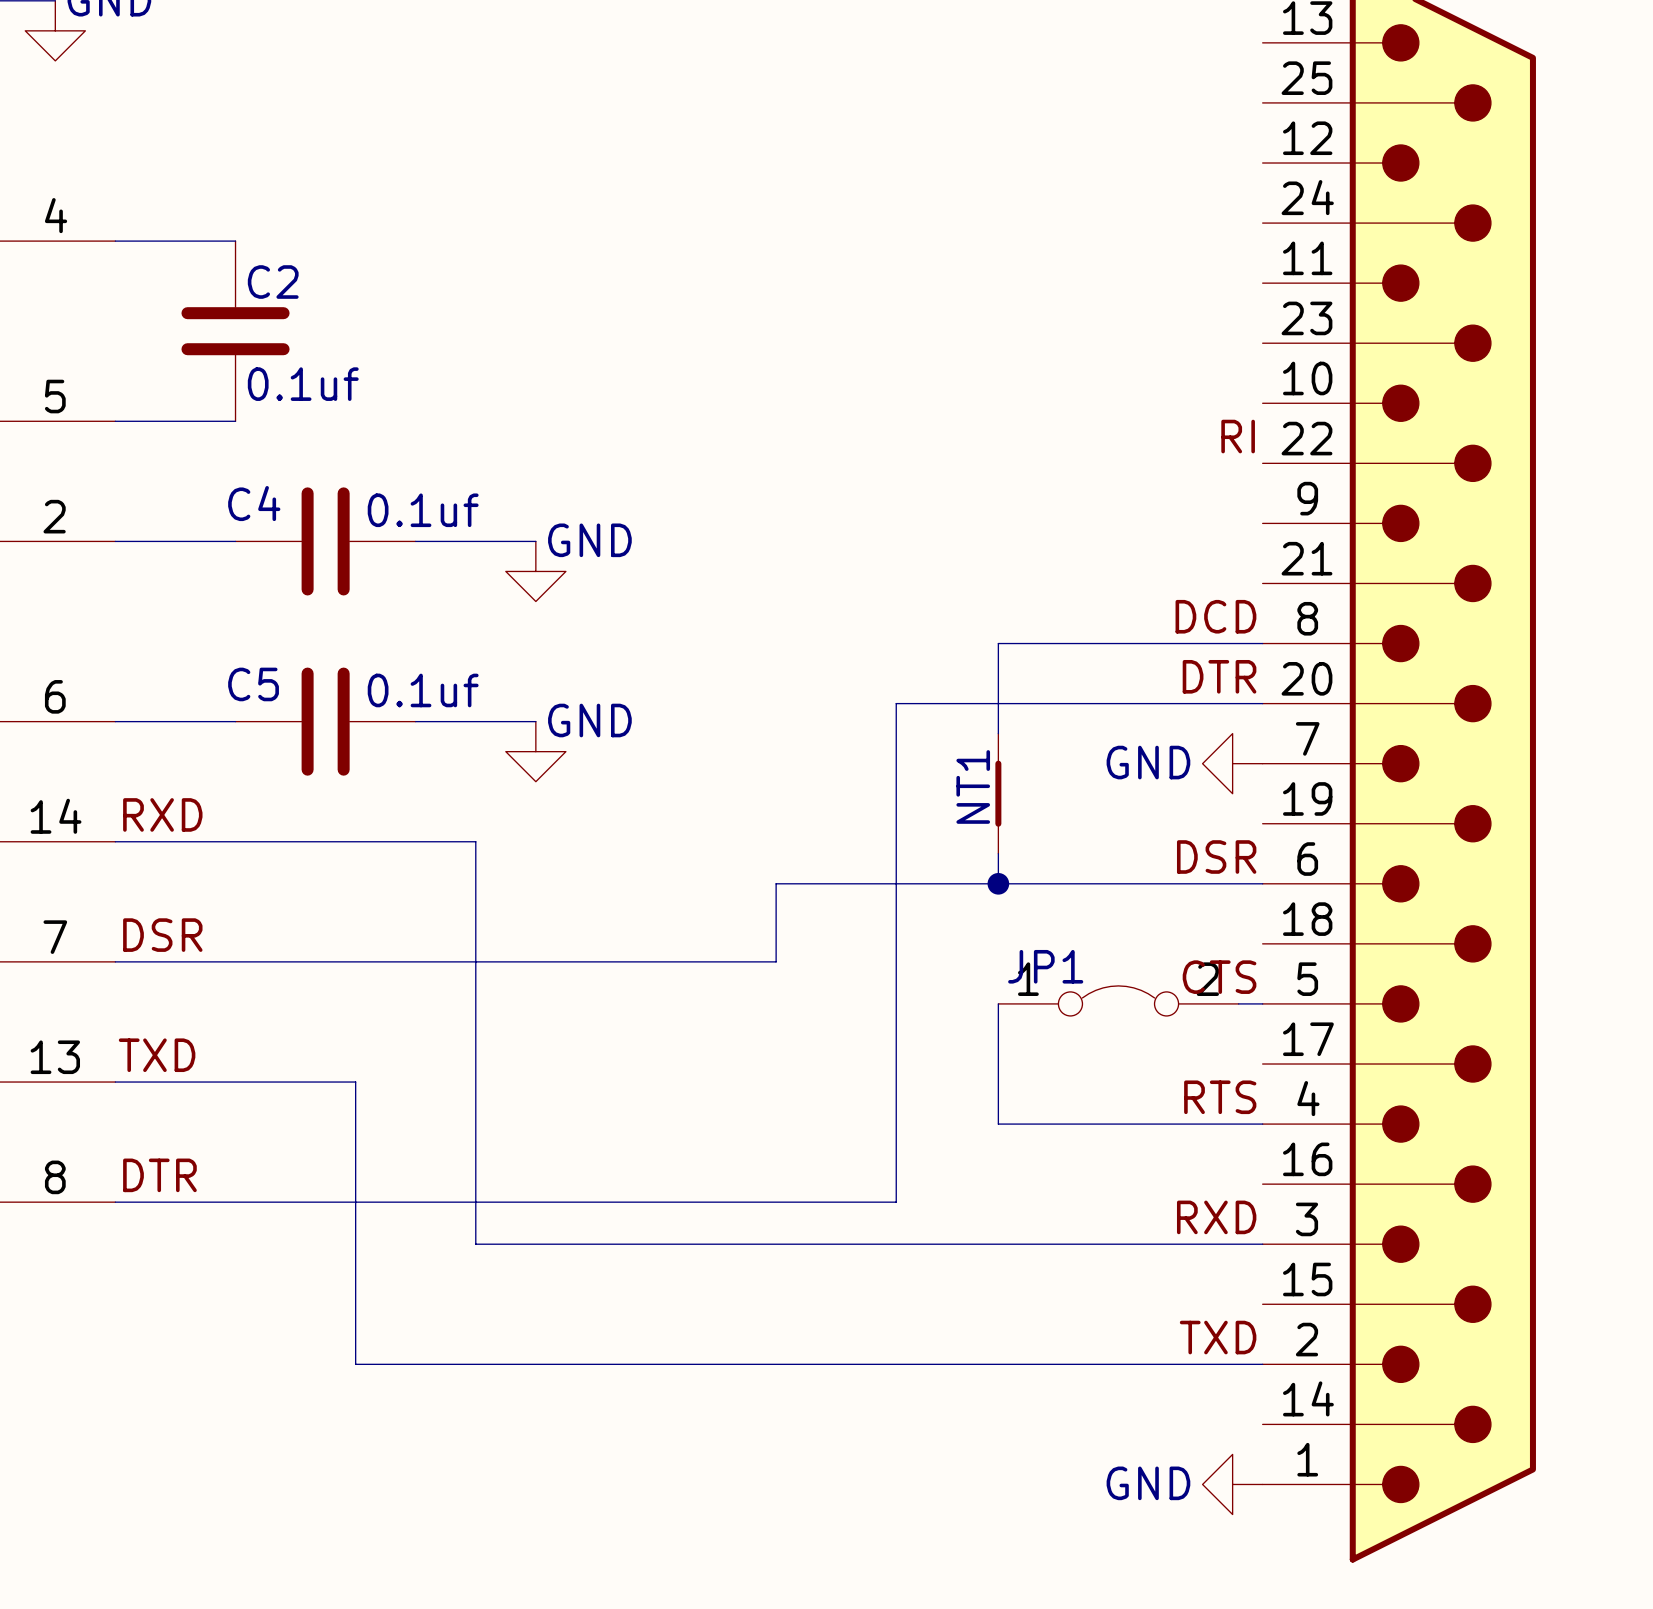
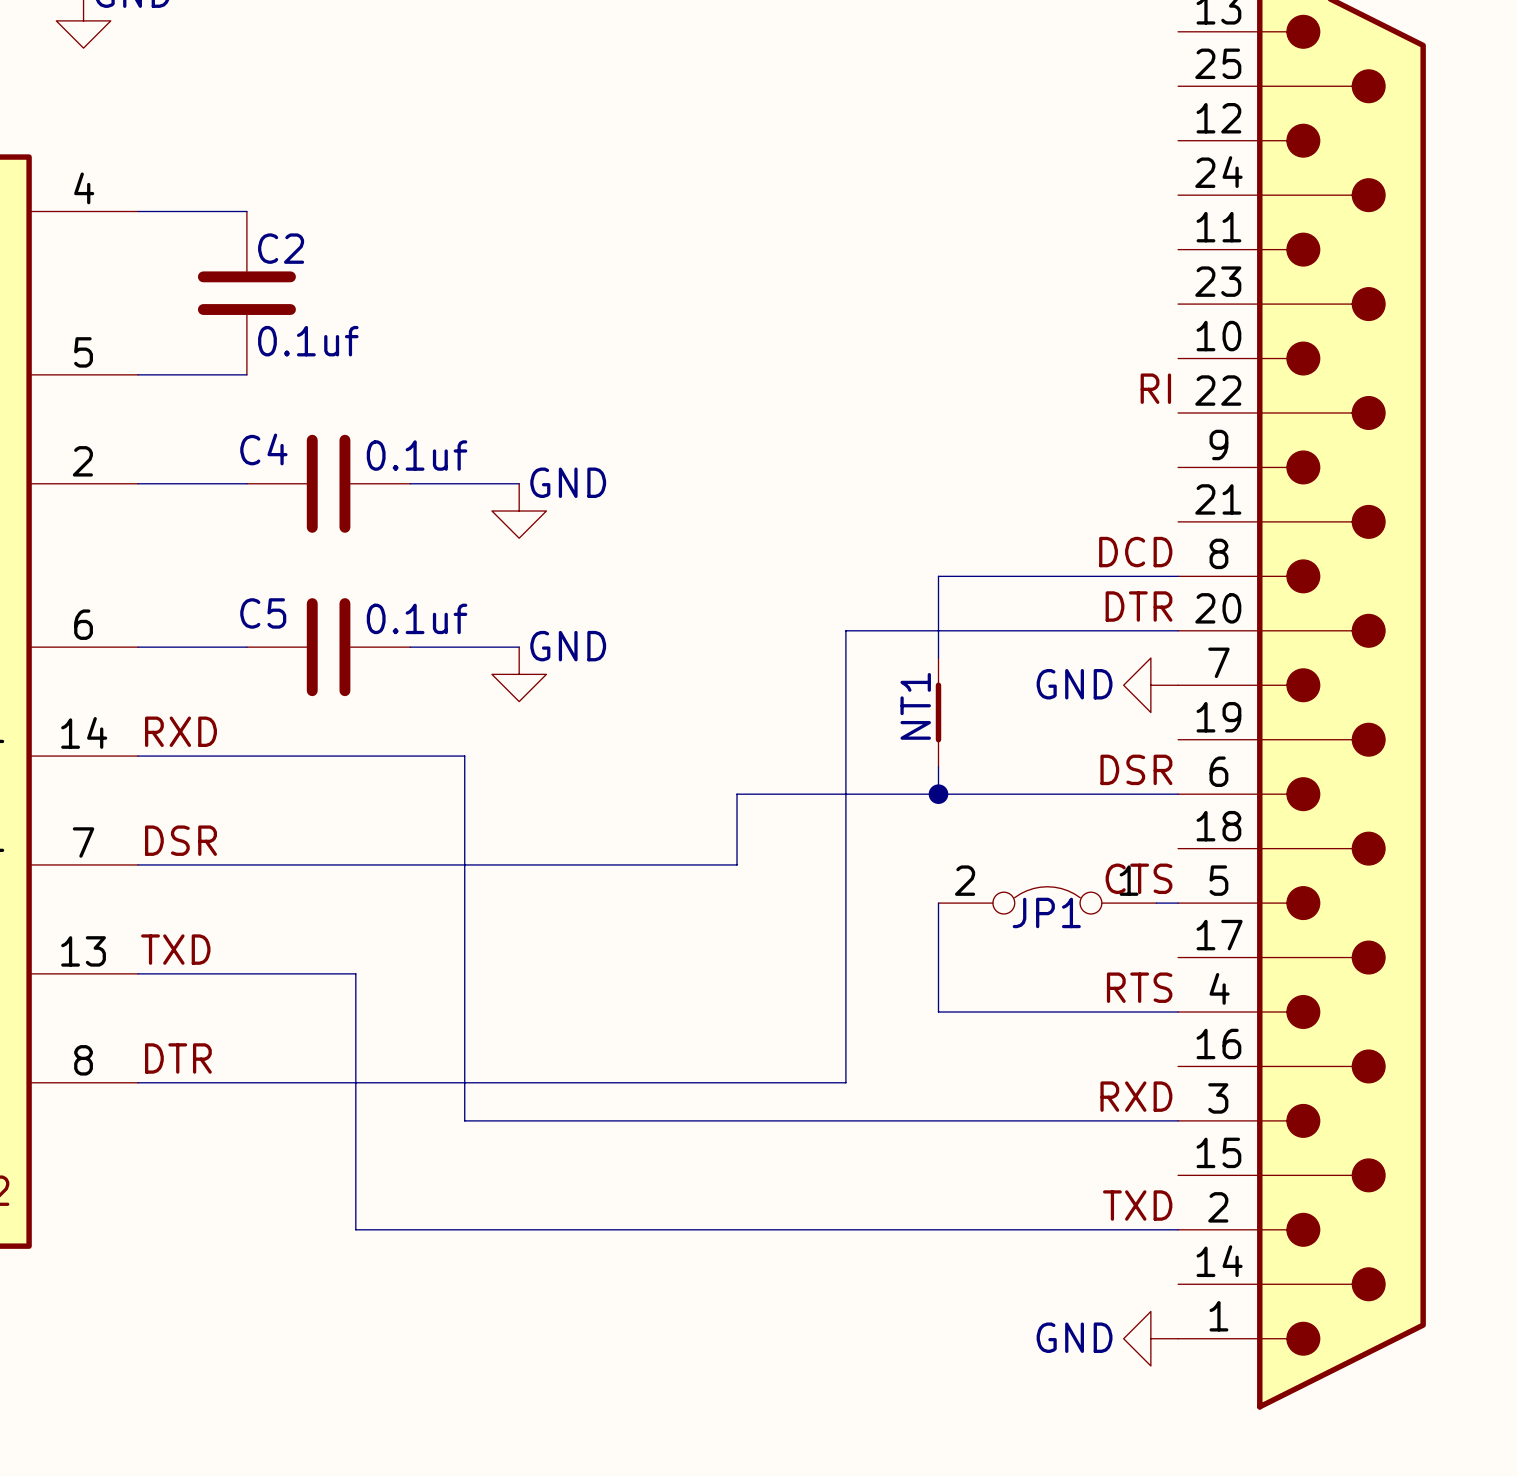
JP1 name position: JP1 (1045, 966) -> JP1 (1046, 912)
JP1 flip: as is (1118, 1000) -> left-right (1047, 900)

